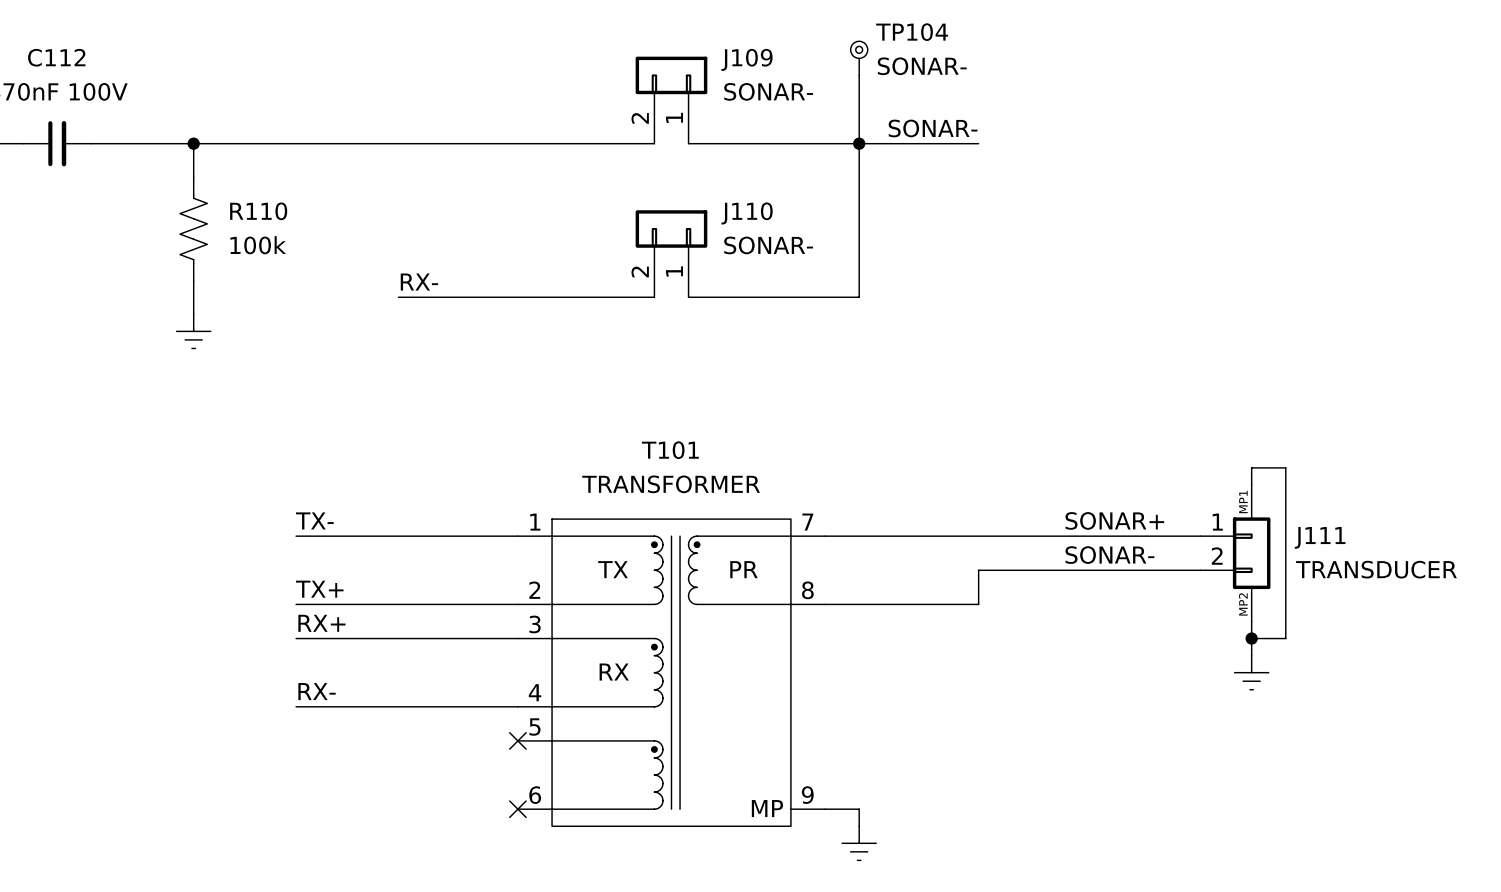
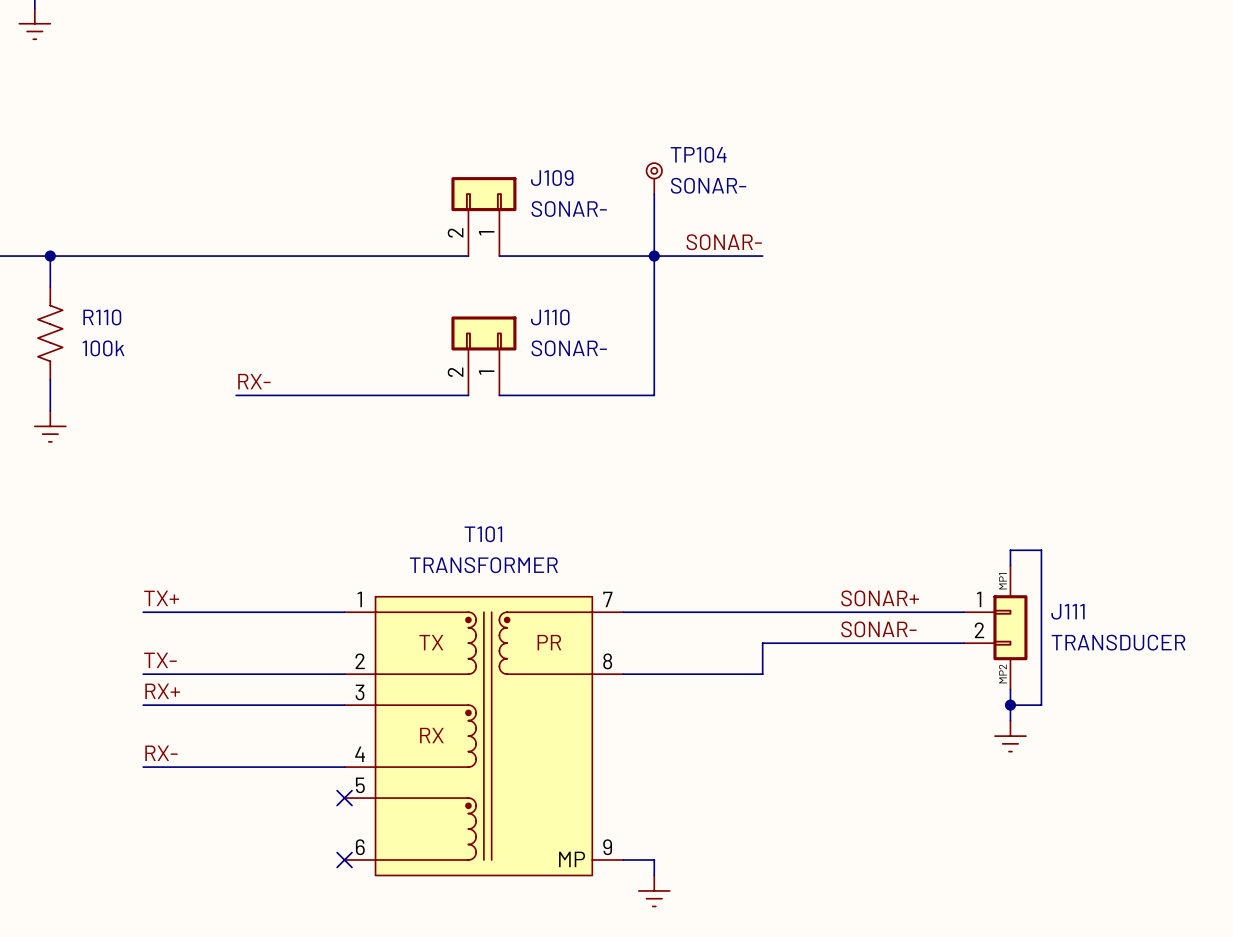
label: TX- (314, 520) -> TX+ (161, 598)
label: TX+ (319, 589) -> TX- (160, 660)

